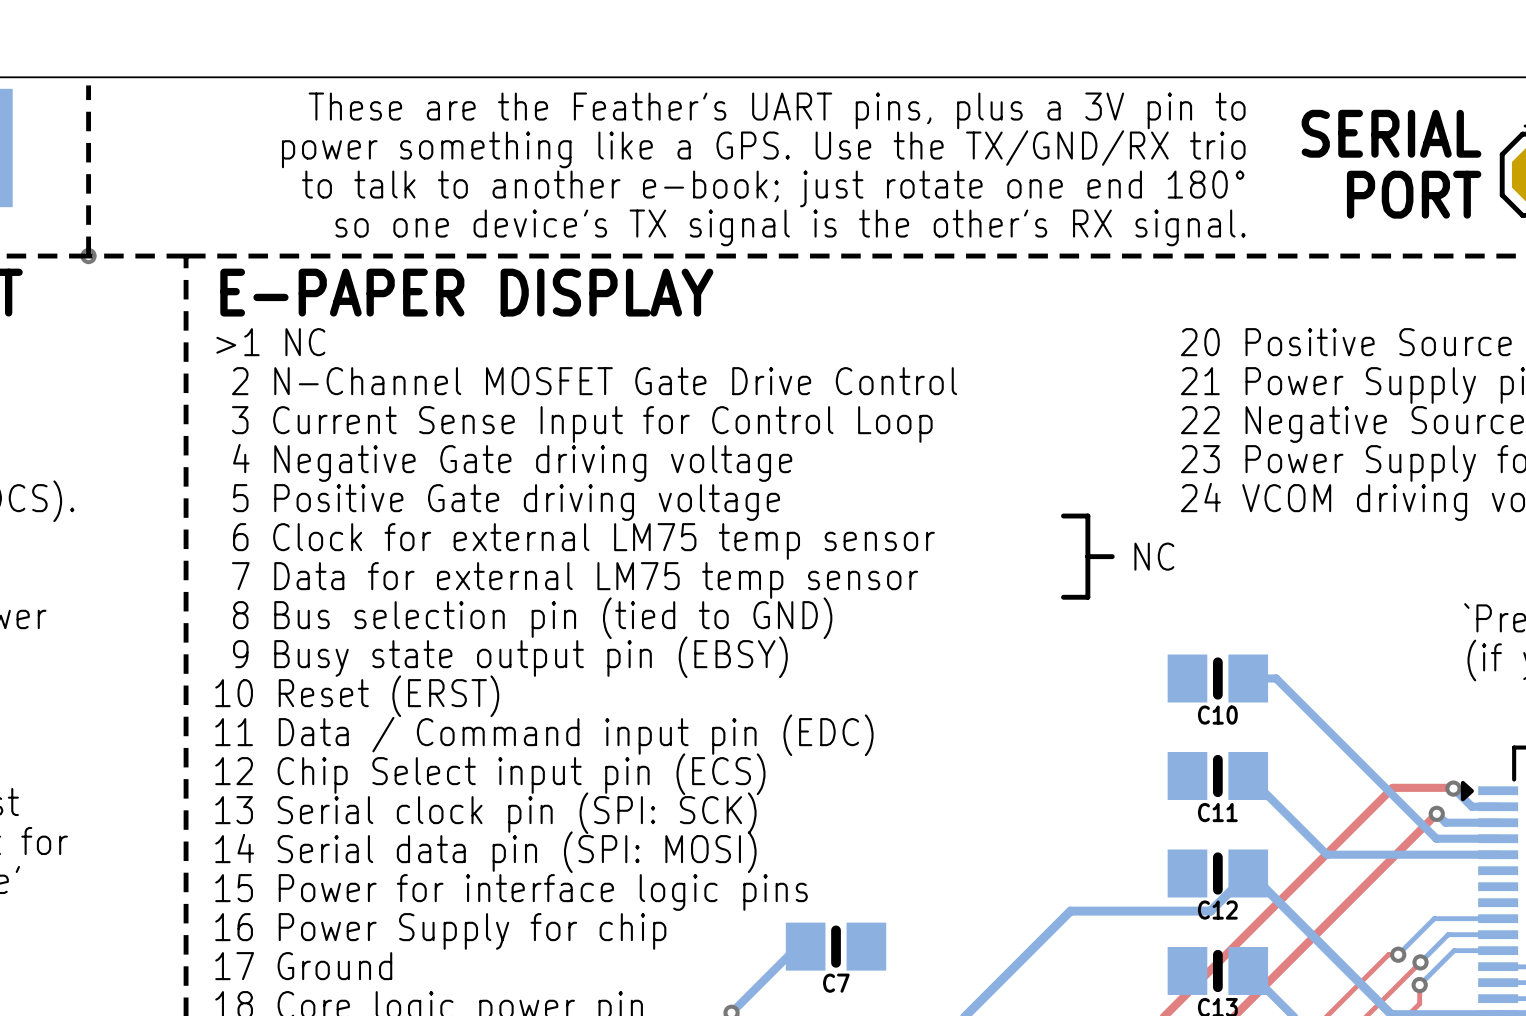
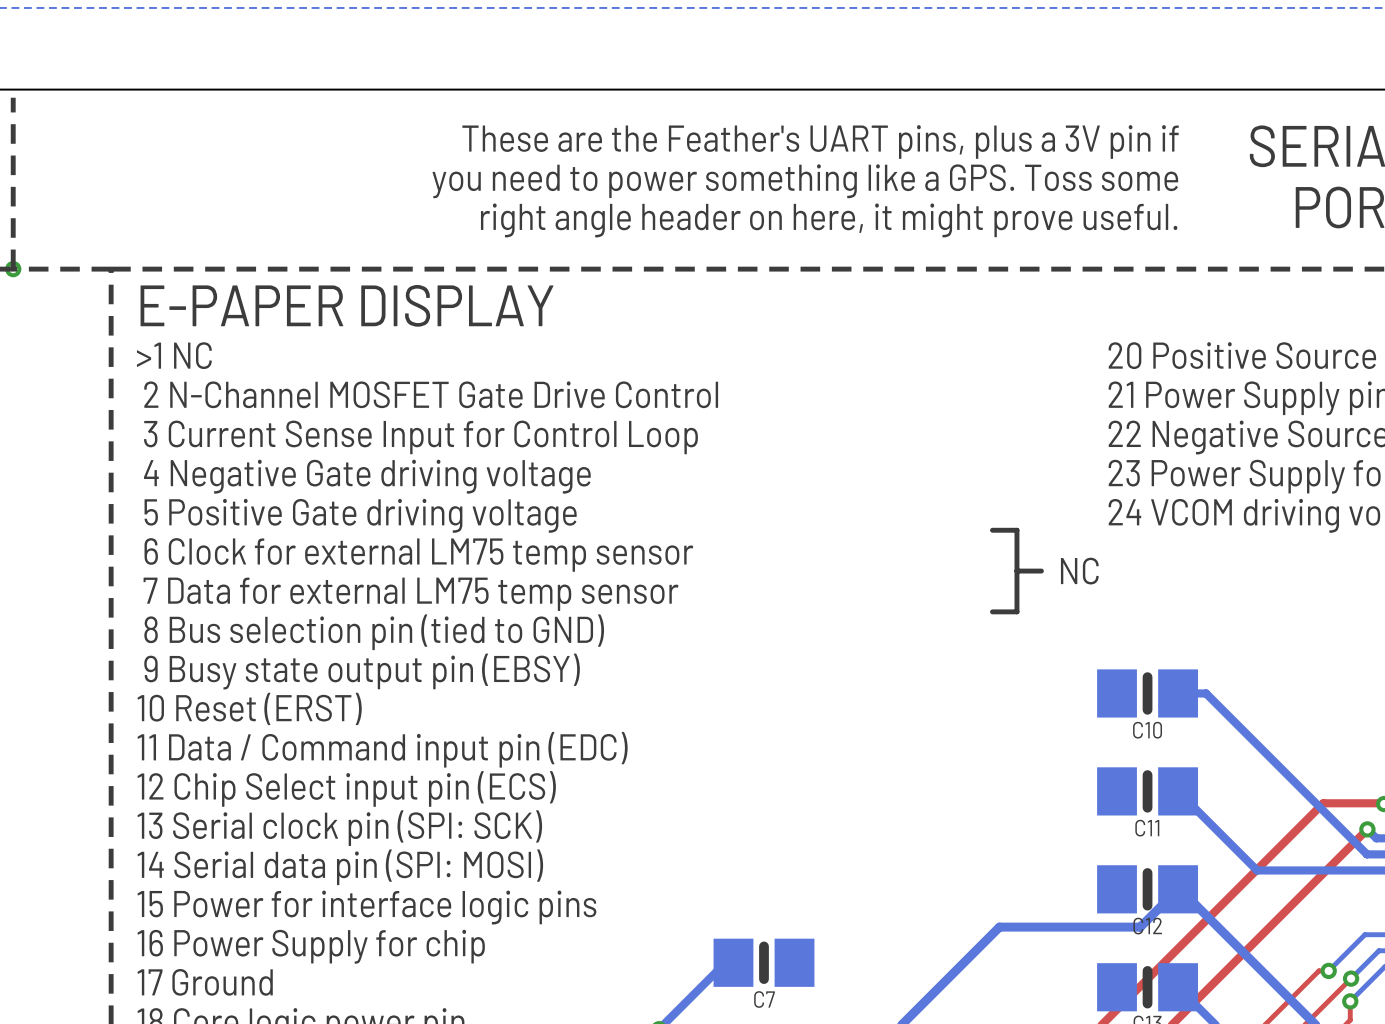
text: These are the Feather's UART pins, plus a 3V pin to (777, 110) -> These are the Feather's UART pins, plus a 3V pin if (820, 141)
text: power something like a GPS. Use the TX/GND/RX trio (763, 149) -> you need to power something like a GPS. Toss some (805, 181)
text: to talk to another e-book; just rotate one end 180° (773, 188) -> none
text: none -> right angle header on here, it might prove useful. (829, 220)
text: so one device's TX signal is the other's RX signal. (790, 227) -> none

